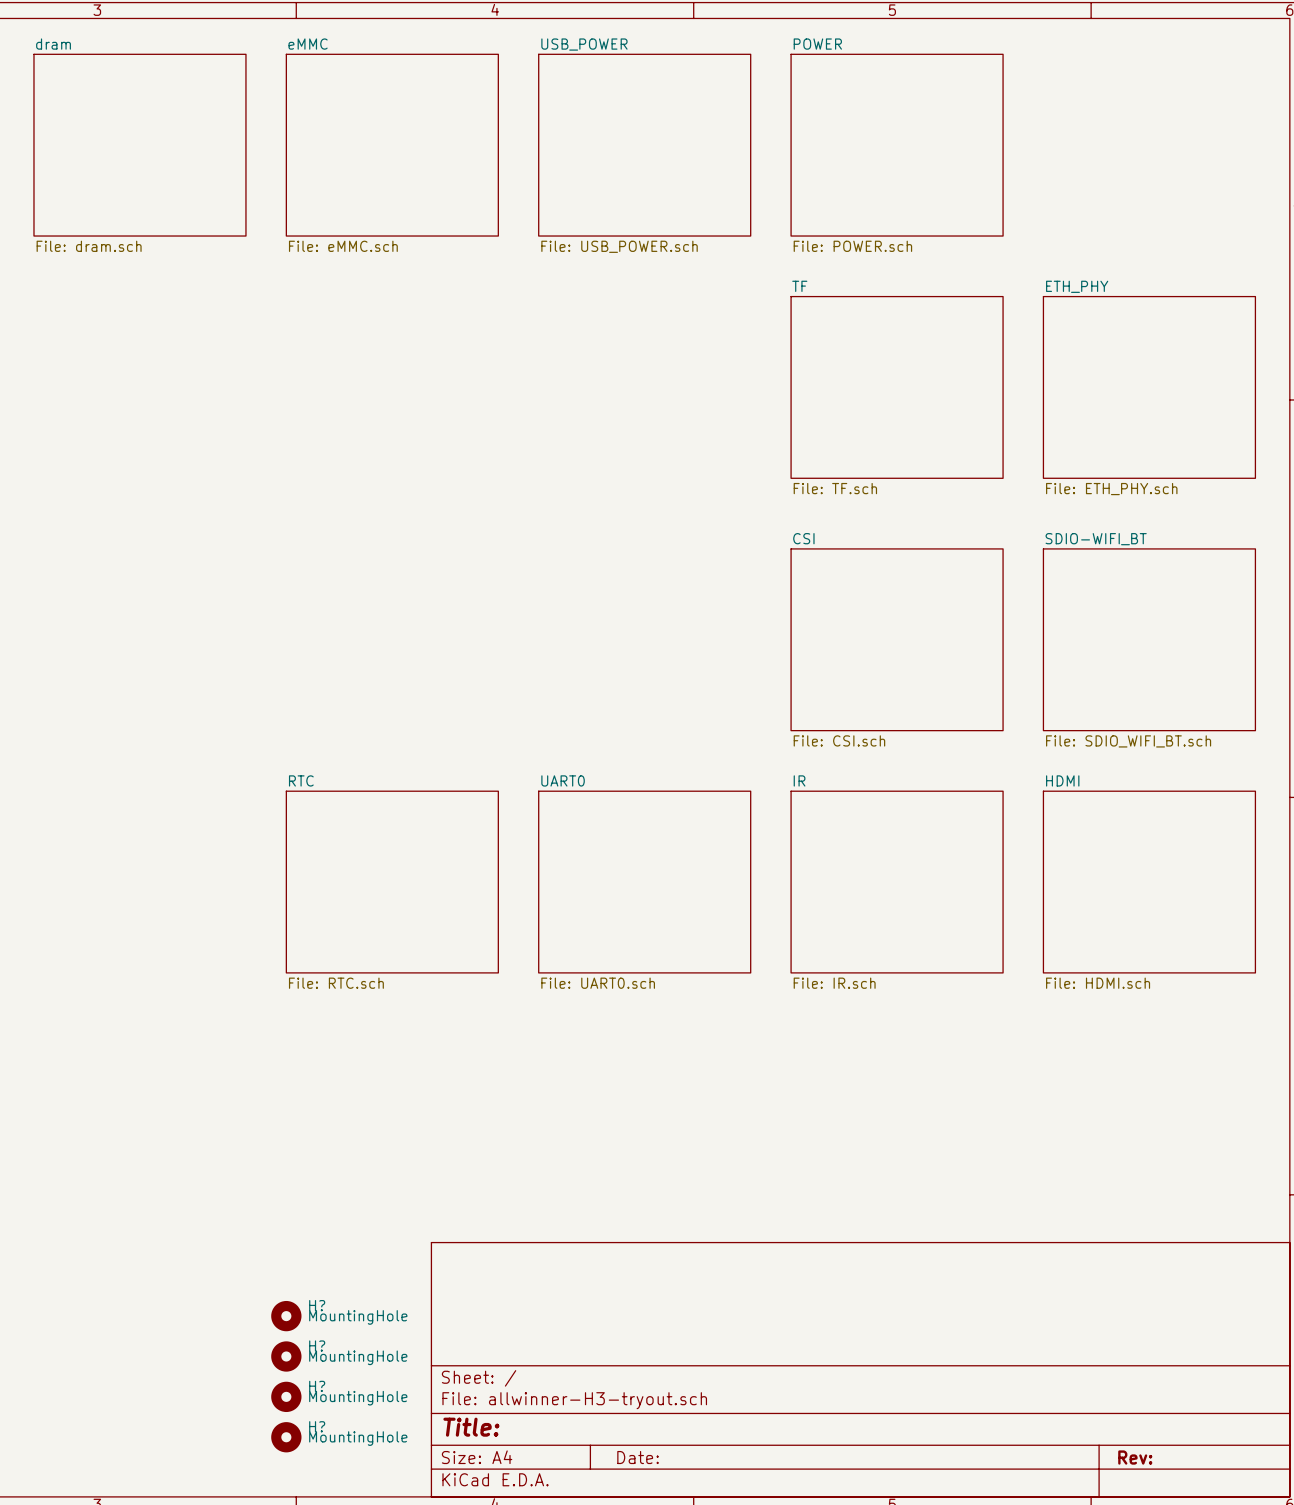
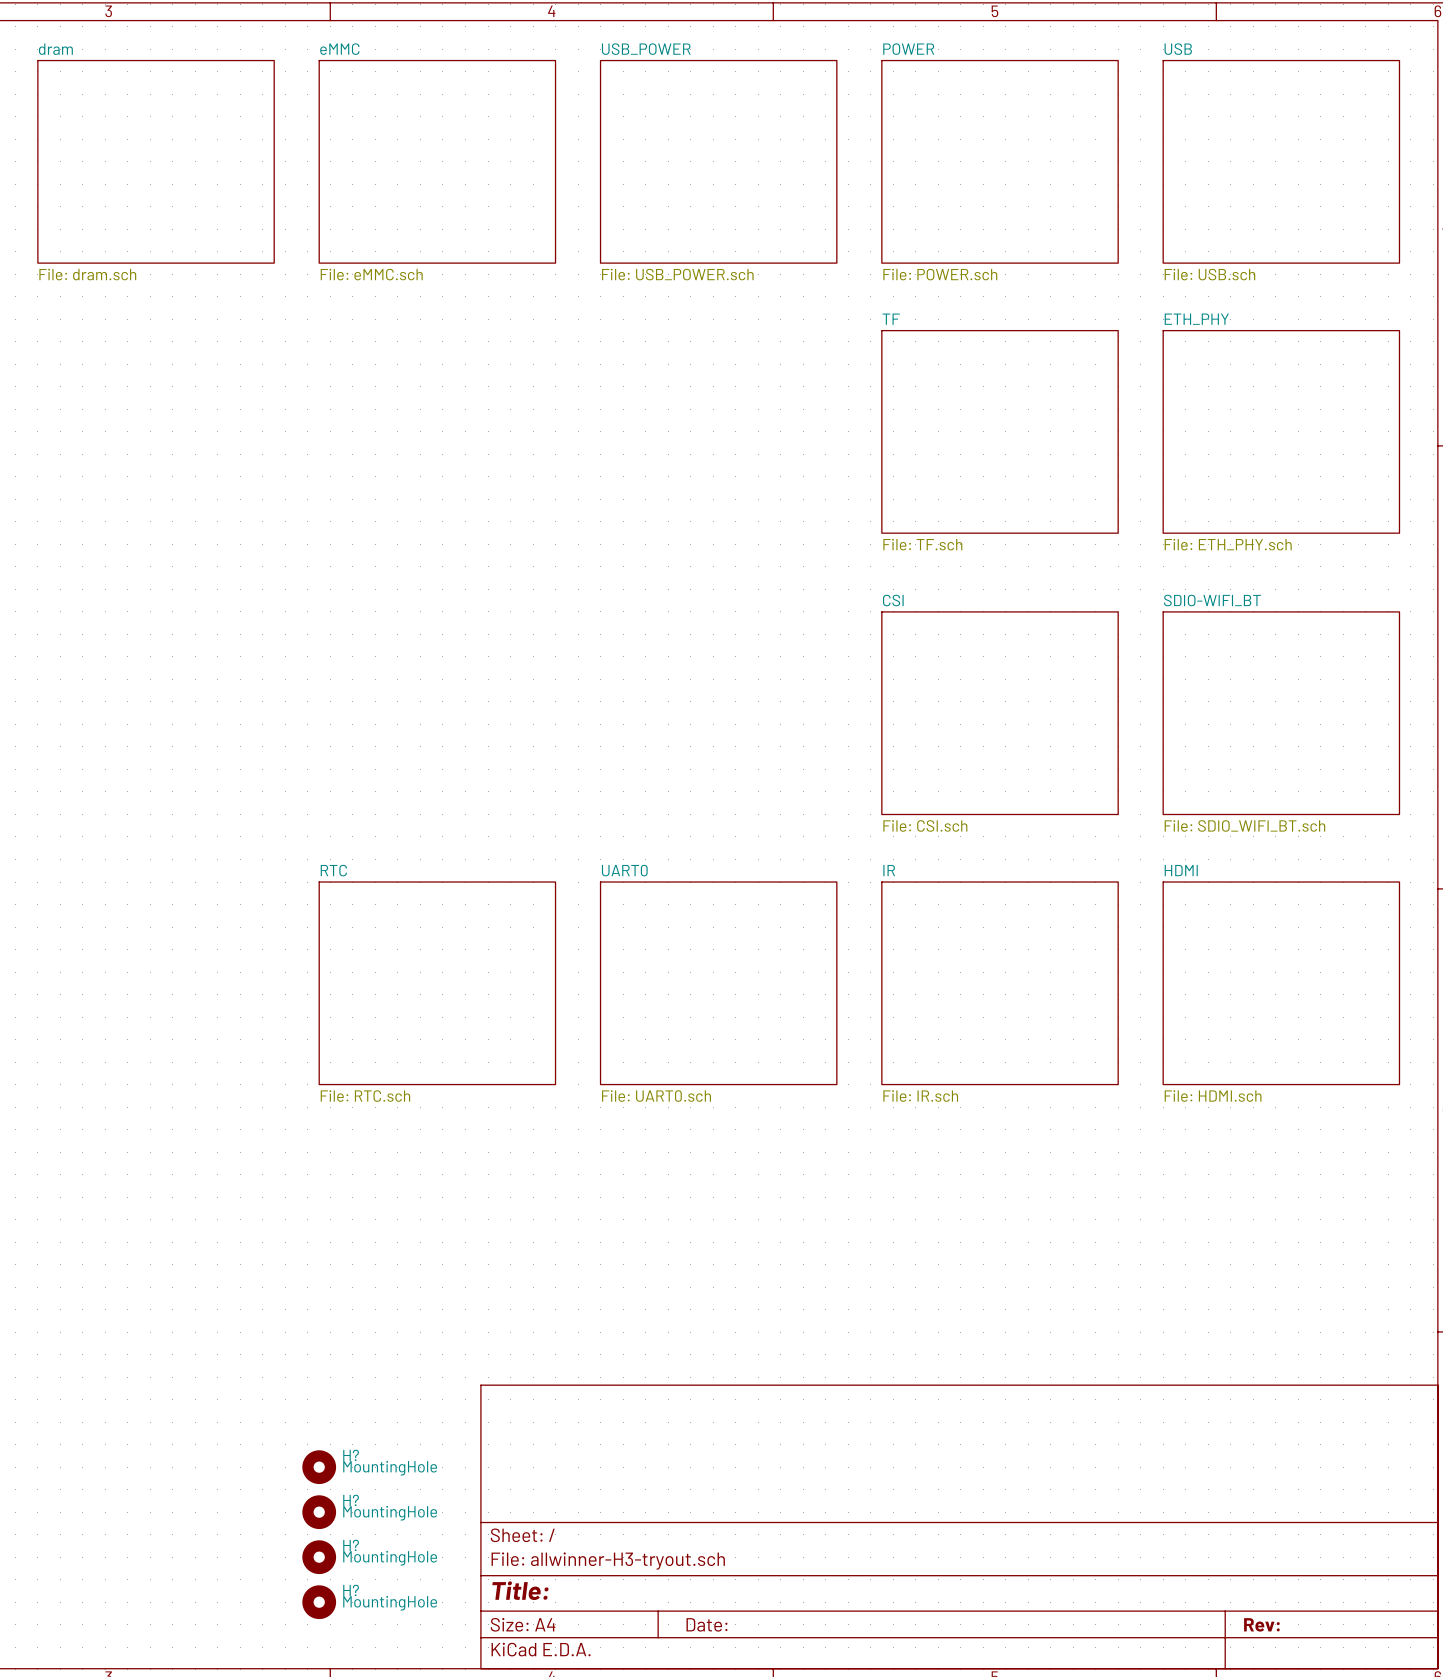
sheet USB: none -> File: USB.sch (1281, 161)

